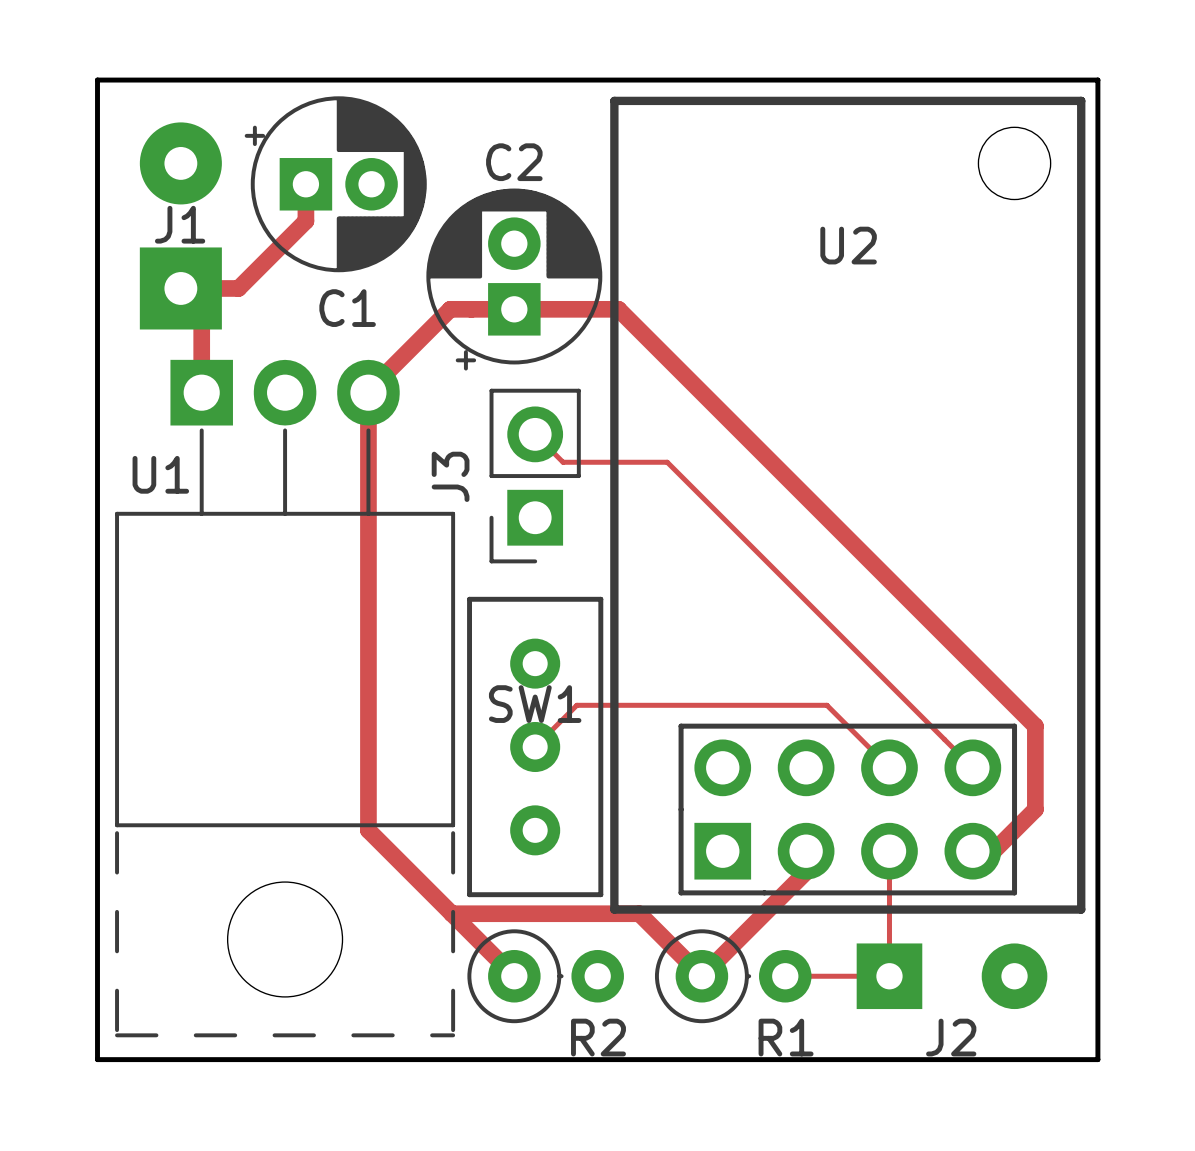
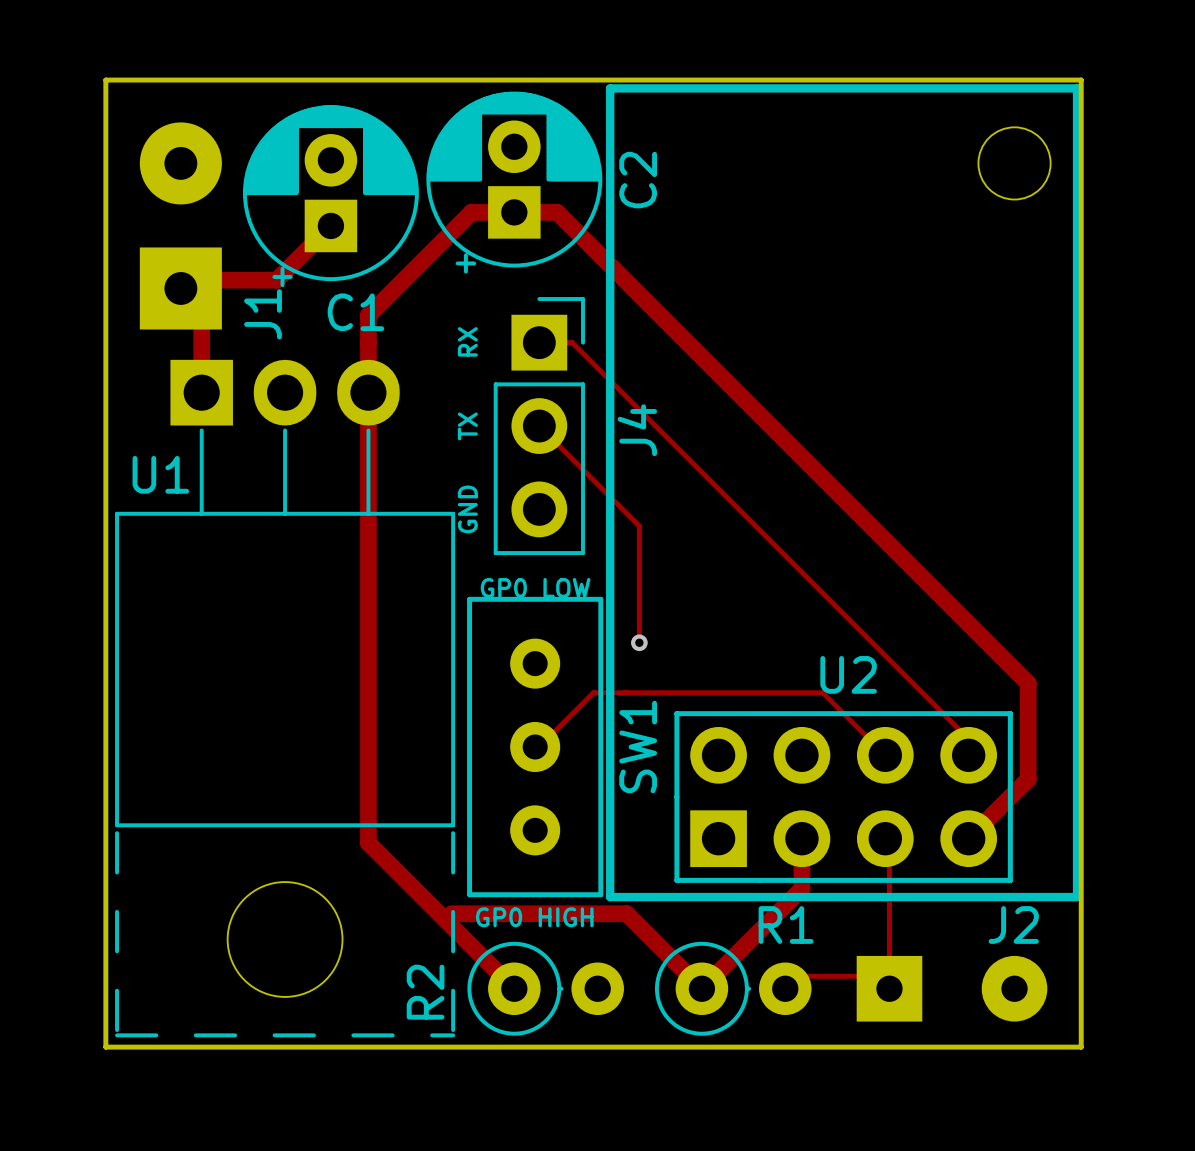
board edge: (105, 80) (97, 80) (97, 1059) (1097, 1059) (1097, 80) (1081, 80) -> (105, 80) (105, 1047) (1081, 1047) (1081, 80)
C2 name rotation: 0° (514, 162) -> 90° counterclockwise (638, 180)
C2 name position: C2 (514, 162) -> C2 (638, 180)
track: (305, 184) (305, 221) (238, 288) (180, 288) -> (330, 225) (276, 280) (172, 280) (180, 288)
C1 rotation: 0° (335, 184) -> 90° counterclockwise (330, 196)
J1 name rotation: 0° (180, 224) -> 90° counterclockwise (263, 314)
J1 name position: J1 (180, 224) -> J1 (263, 314)
U2 name position: U2 (848, 245) -> U2 (848, 674)
C2 position: (514, 279) -> (514, 182)
text: none -> RX (467, 341)
track: none -> (539, 342) (572, 342) (968, 739) (968, 755)
track: (368, 391) (450, 309) (618, 309) (1035, 726) (1035, 809) (993, 851) (972, 851) -> (368, 391) (368, 315) (471, 212) (557, 212) (1028, 683) (1028, 779) (968, 838)
text: none -> TX (467, 426)
track: none -> (539, 426) (639, 526) (639, 642)
J4: none -> (539, 426)
track: (535, 434) (563, 462) (667, 462) (972, 767) -> none
J3: (535, 476) -> none
U2 position: (847, 505) -> (843, 492)
text: none -> GND (467, 509)
text: none -> GP0 LOW (535, 587)
via: none -> (639, 642)
SW1 name rotation: 0° (535, 704) -> 90° counterclockwise (638, 746)
track: (535, 746) (576, 705) (826, 705) (889, 767) -> none
track: none -> (535, 751) (593, 692) (822, 692) (885, 755)
track: (368, 830) (514, 976) -> (368, 830) (368, 842) (514, 988)
track: (806, 851) (806, 872) (701, 976) (639, 913) (626, 913) -> (801, 838) (801, 888) (701, 988) (626, 913)
text: none -> GP0 HIGH (534, 917)
R2 position: (545, 976) -> (545, 988)
R1 position: (733, 976) -> (733, 988)
J2 position: (952, 976) -> (952, 988)
R2 name rotation: 0° (598, 1037) -> 90° counterclockwise (425, 992)
R2 name position: R2 (598, 1037) -> R2 (425, 992)
R1 name position: R1 (786, 1037) -> R1 (786, 925)
J2 name position: J2 (951, 1037) -> J2 (1013, 925)

